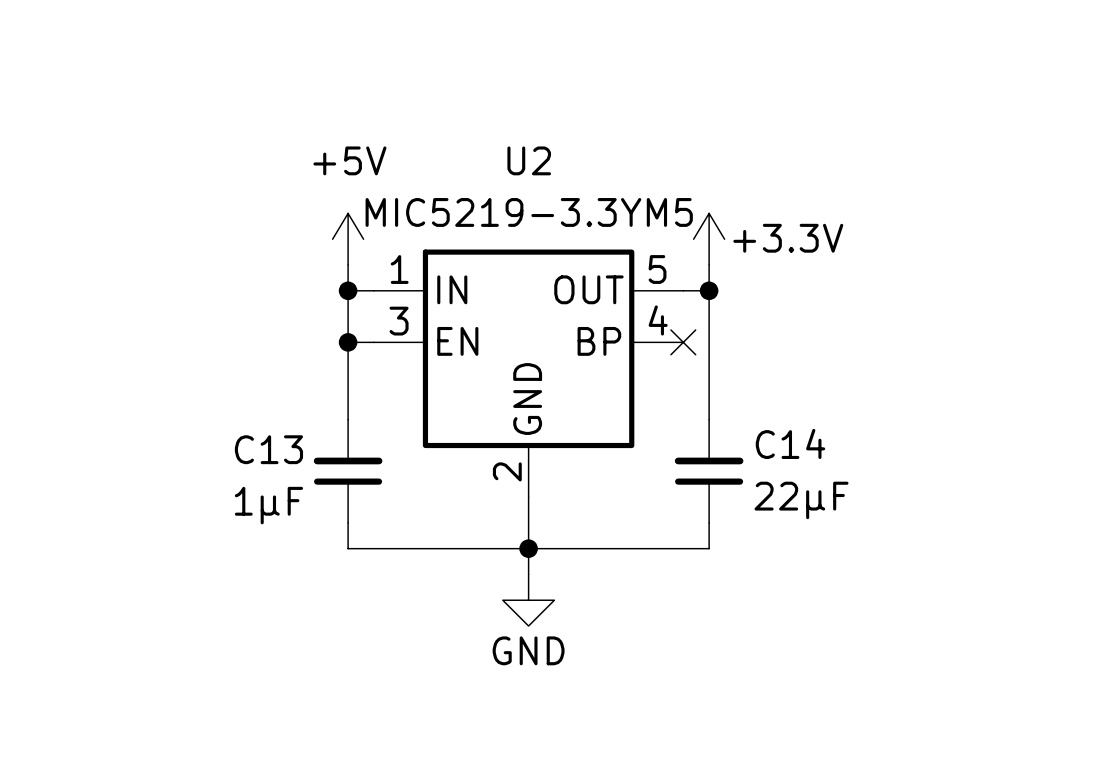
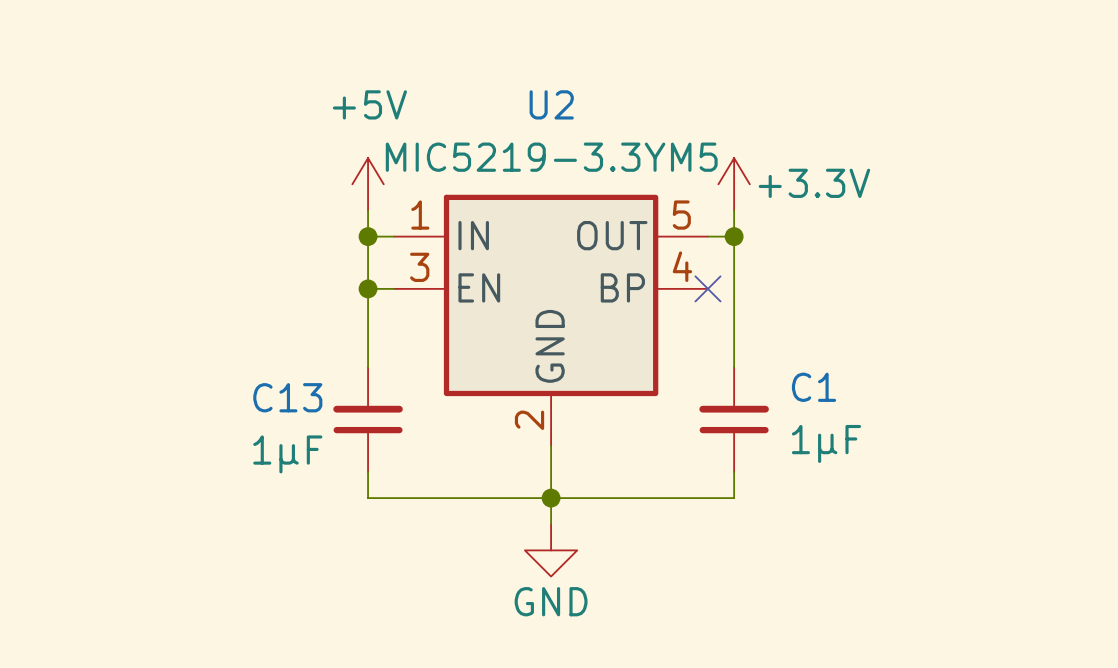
C14 name: C14 (790, 443) -> C1 (814, 387)
C14 value: 22µF (801, 500) -> 1µF (826, 443)

